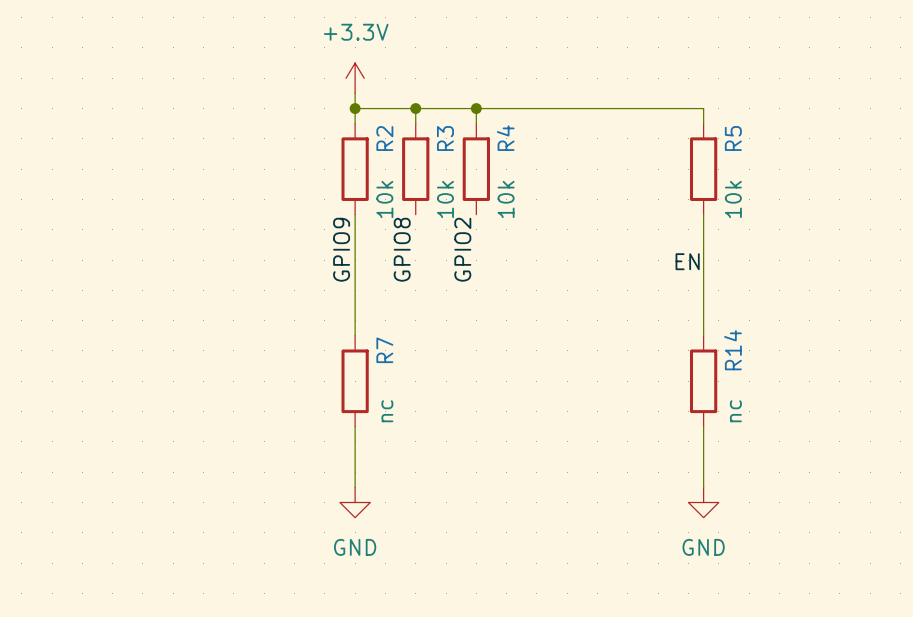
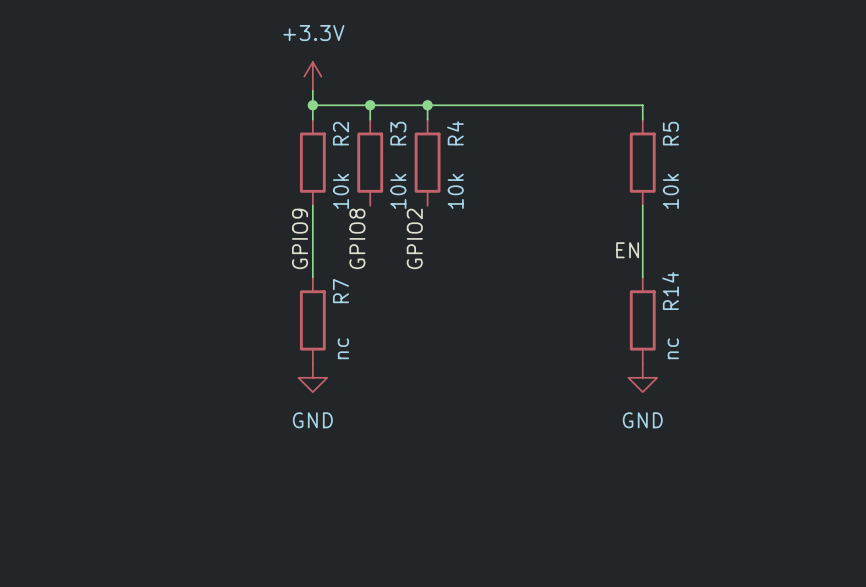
wire: (355, 290) (355, 335) -> none
wire: (703, 290) (703, 335) -> none
R7 position: (355, 381) -> (312, 320)
R14 position: (703, 381) -> (642, 320)
wire: (355, 426) (355, 487) -> none
wire: (703, 426) (703, 487) -> none
power symbol position: GND (355, 502) -> GND (312, 377)
power symbol position: GND (703, 502) -> GND (642, 377)

